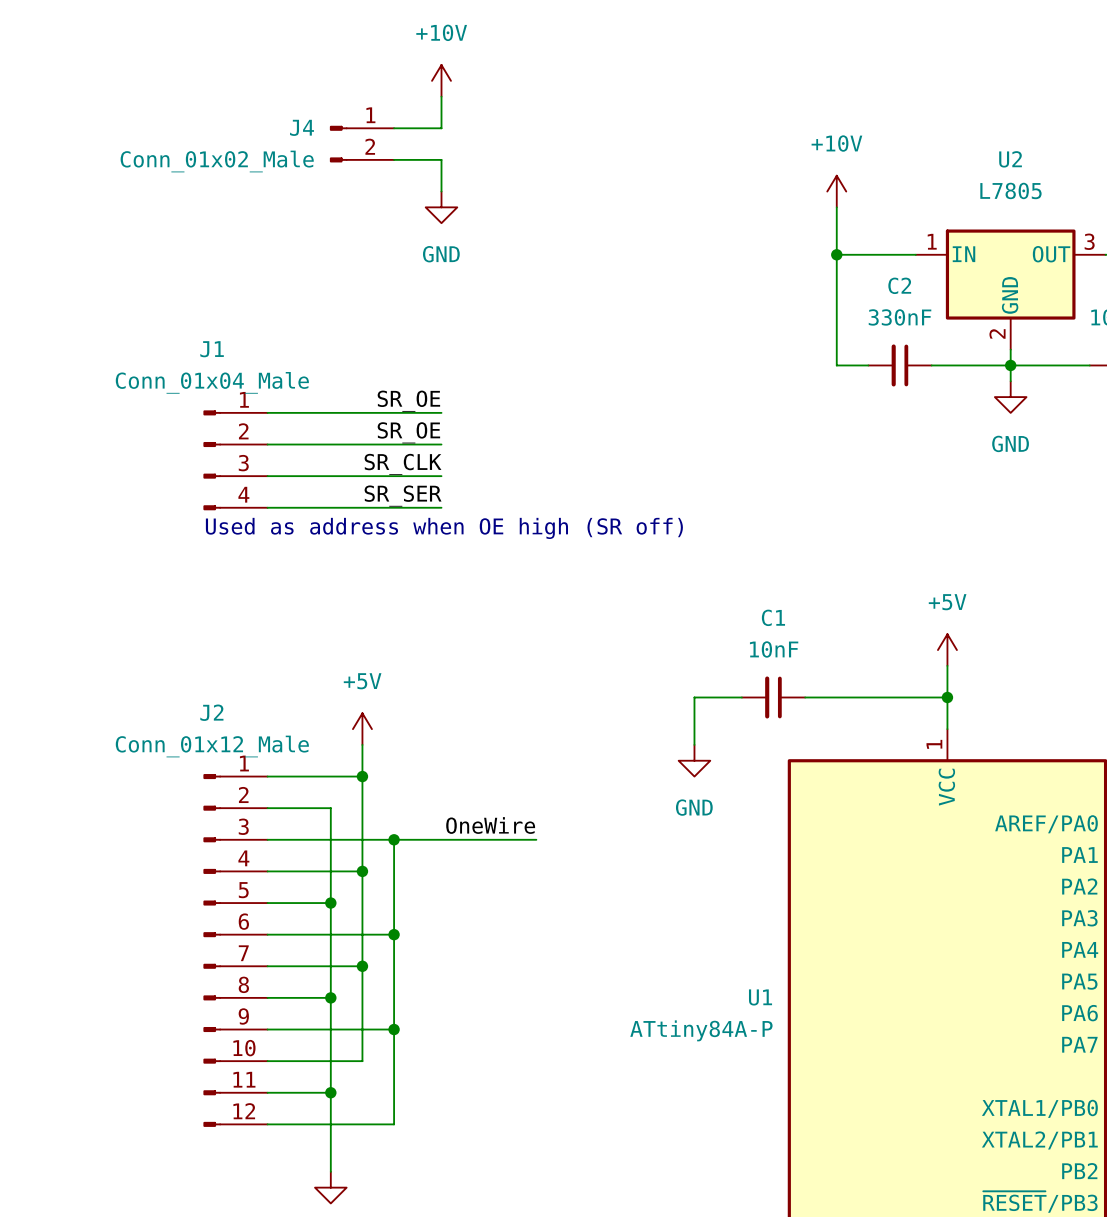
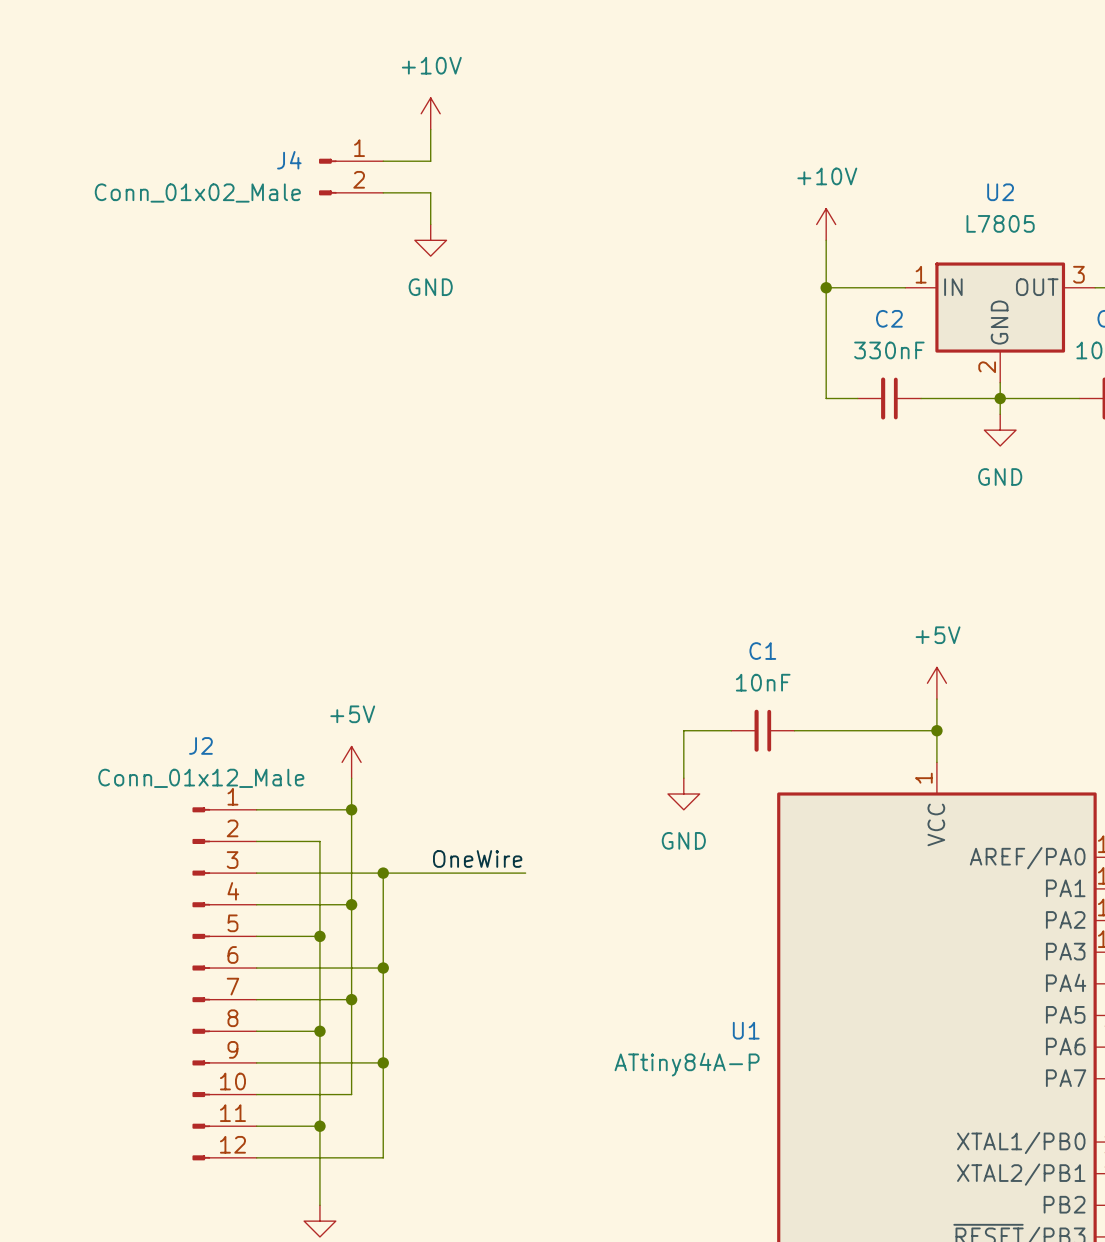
label: SR_OE (408, 401) -> none
wire: (267, 412) (441, 412) -> none
label: SR_OE (408, 432) -> none
wire: (267, 444) (441, 444) -> none
J1: Conn_01x04_Male (235, 460) -> none
label: SR_CLK (403, 464) -> none
wire: (267, 476) (441, 476) -> none
label: SR_SER (403, 496) -> none
wire: (267, 507) (441, 507) -> none
text: Used as address when OE high (SR off) (444, 528) -> none

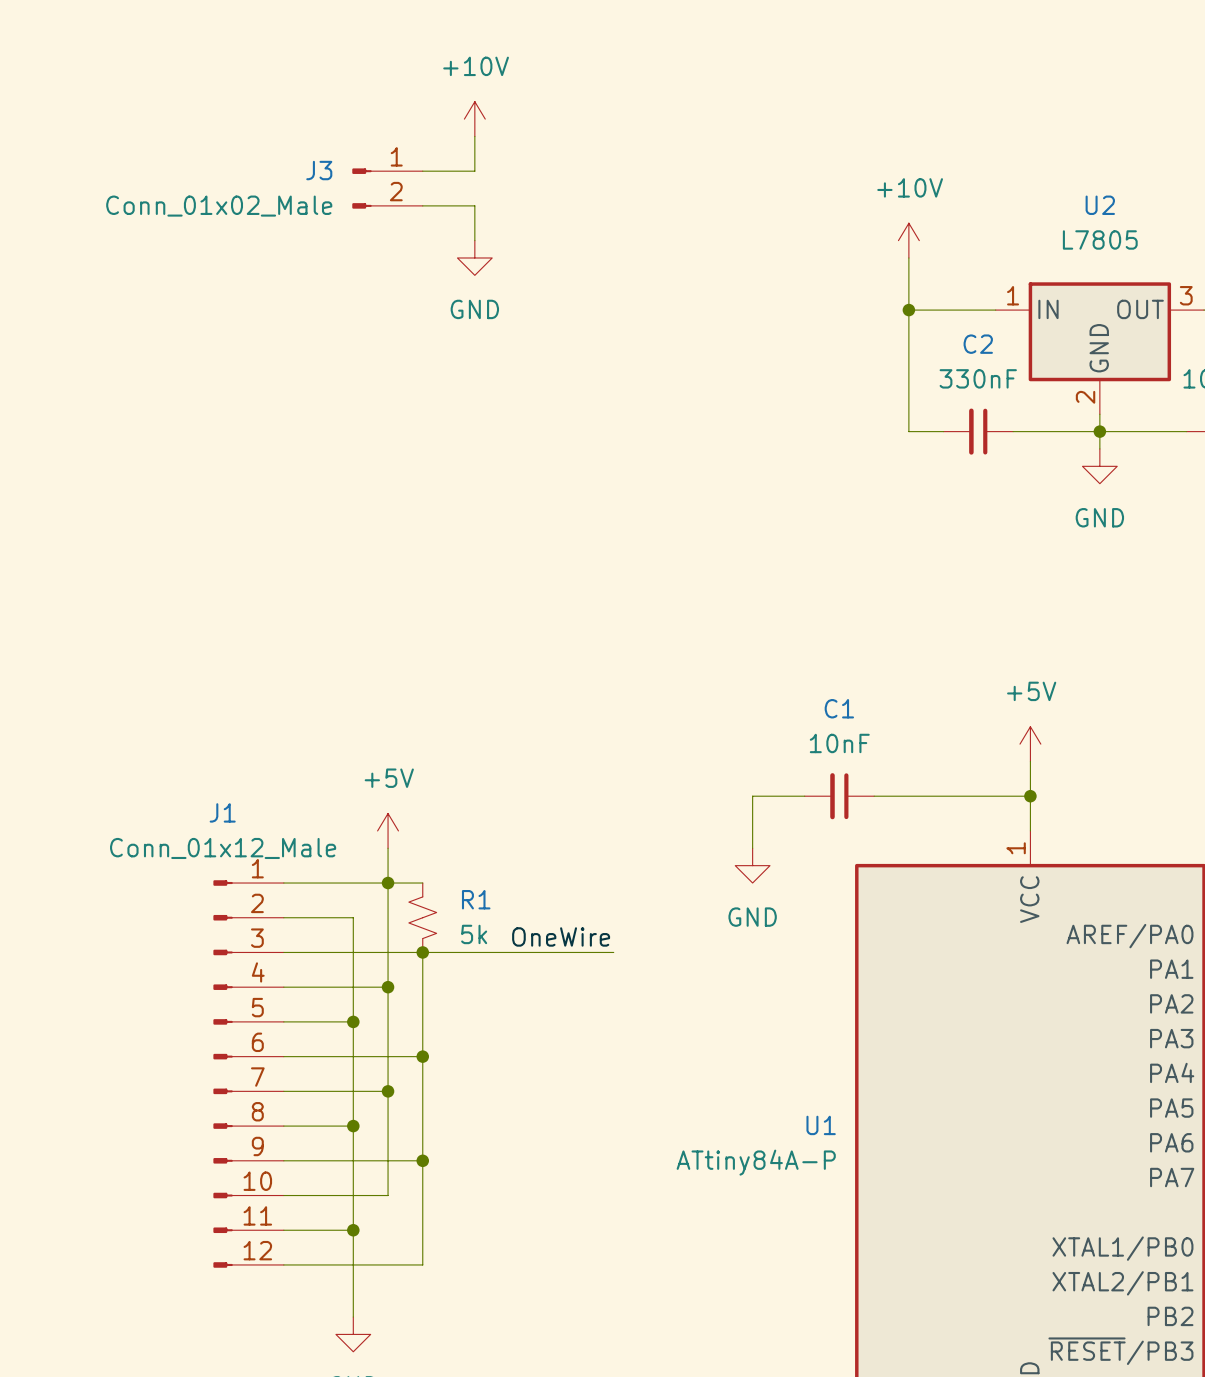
J4 name: J4 (289, 160) -> J3 (319, 170)
J2 name: J2 (200, 745) -> J1 (222, 812)
wire: none -> (388, 883) (422, 883)
R1: none -> 5k (422, 917)
label position: OneWire (477, 858) -> OneWire (561, 936)
wire: none -> (579, 952) (613, 952)

